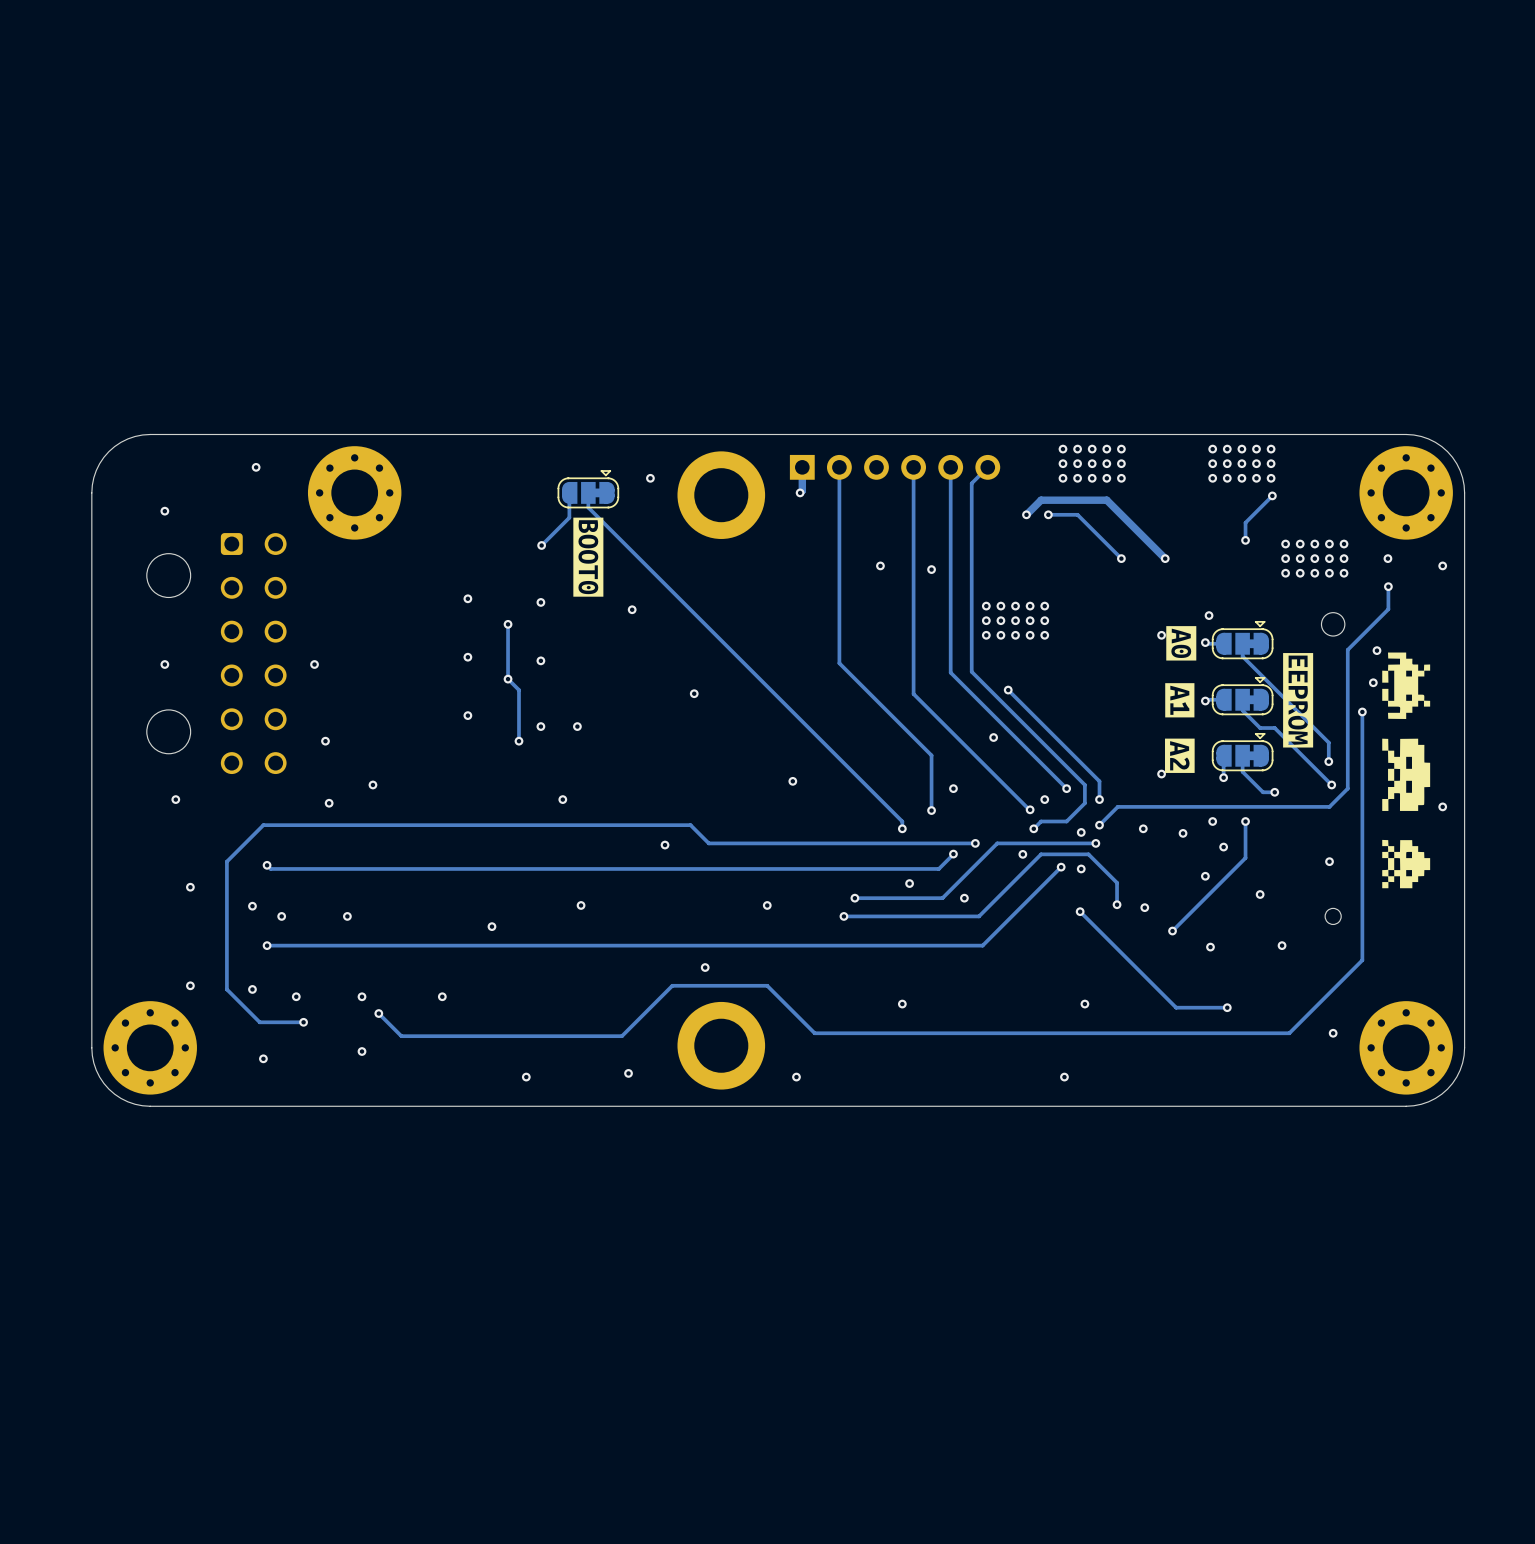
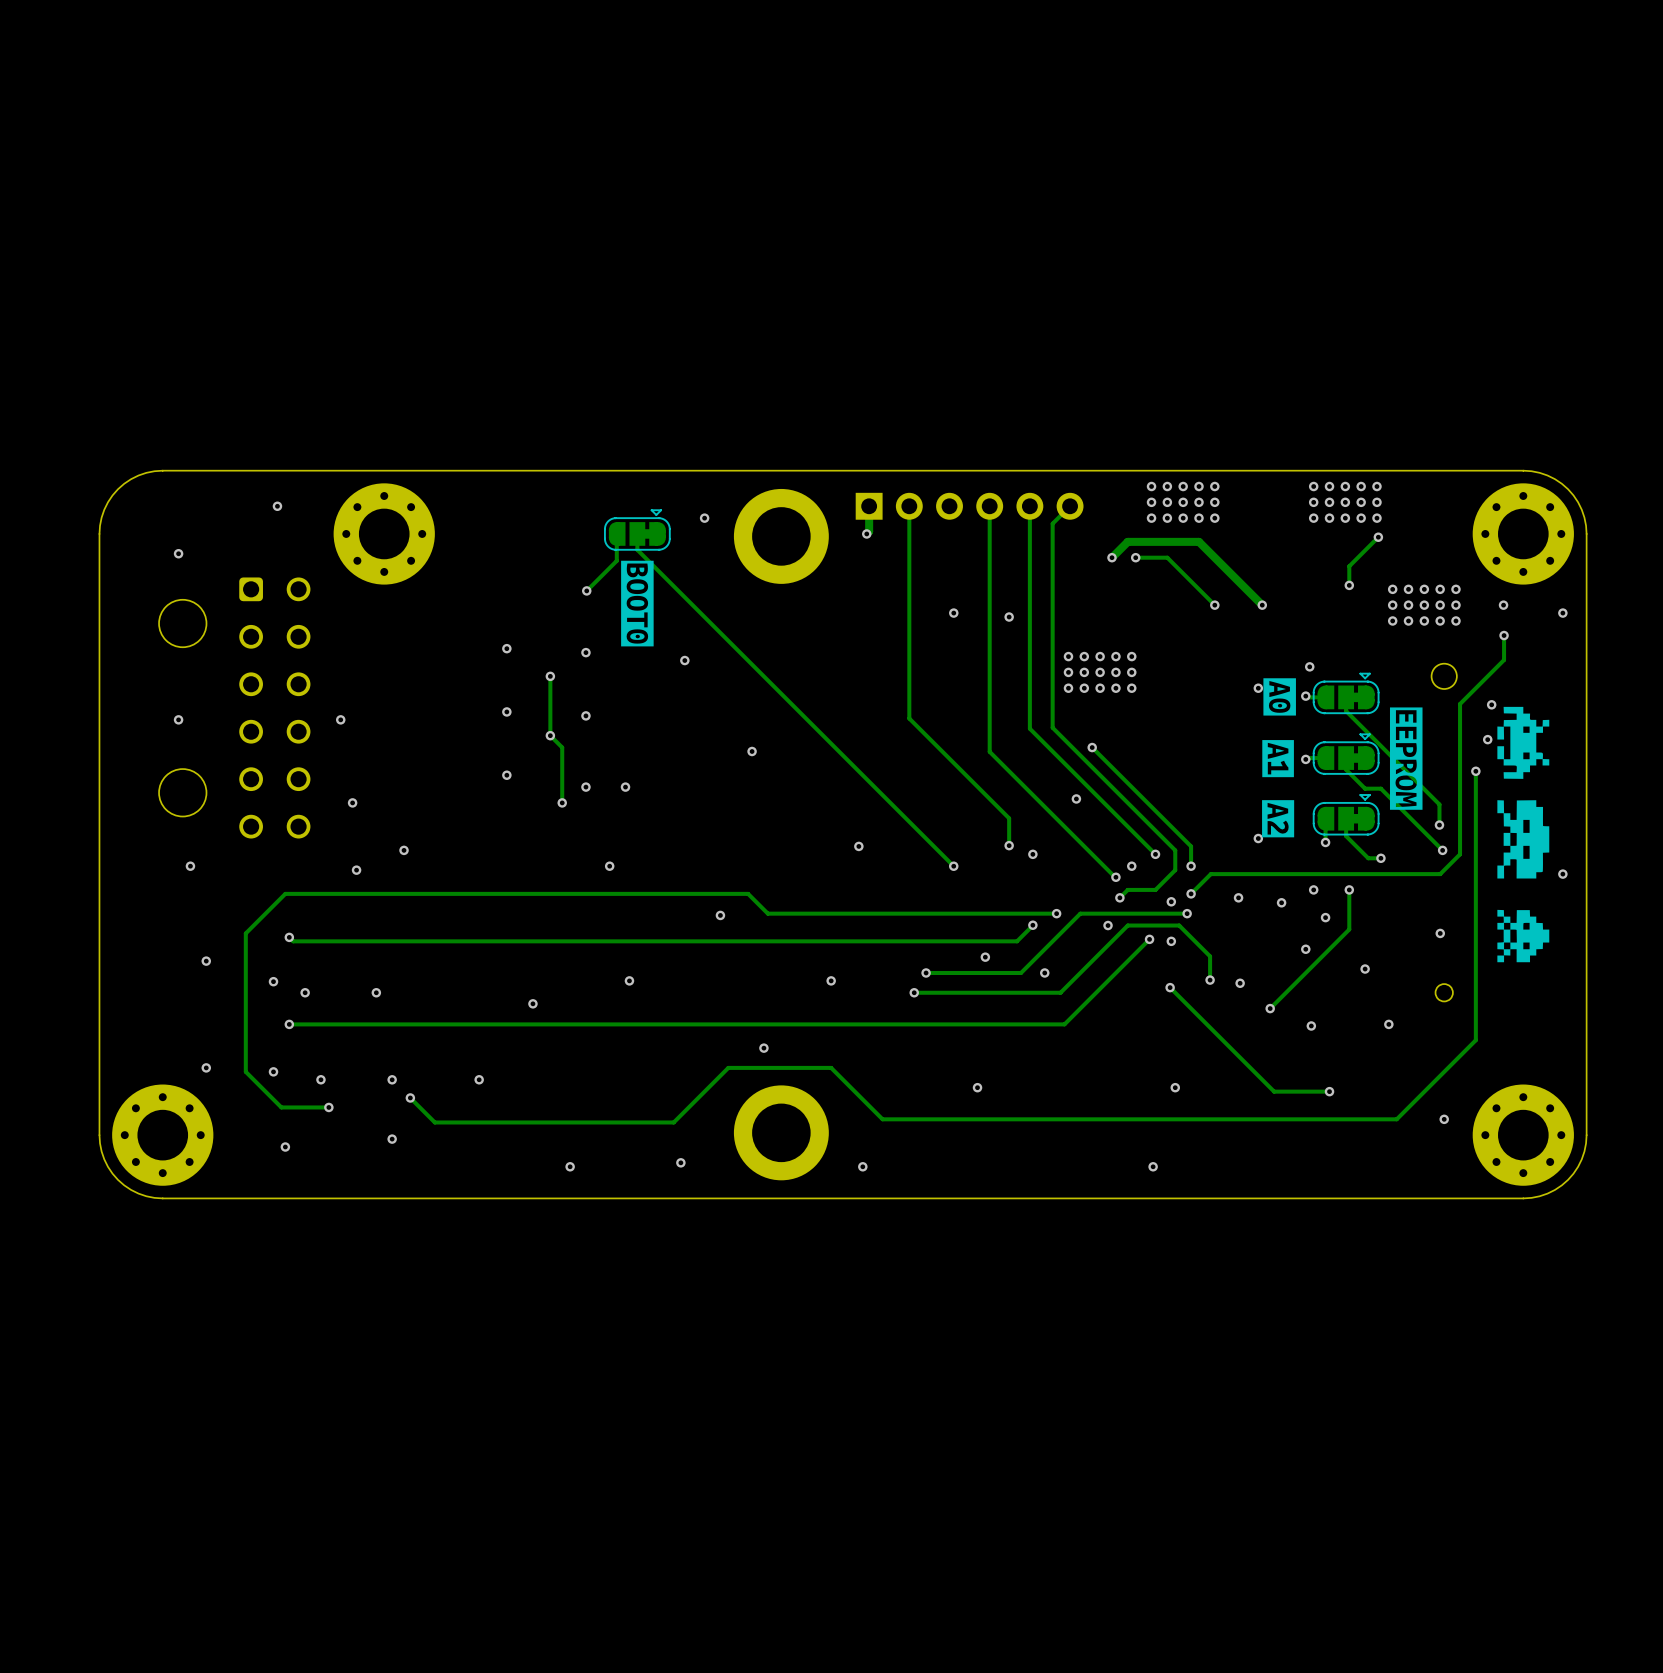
track: (931, 780) (931, 810) -> none
via: none -> (1009, 845)
track: (880, 799) (902, 821) (902, 828) -> none
via: none -> (953, 866)
via: (931, 810) -> none
via: (902, 828) -> none

